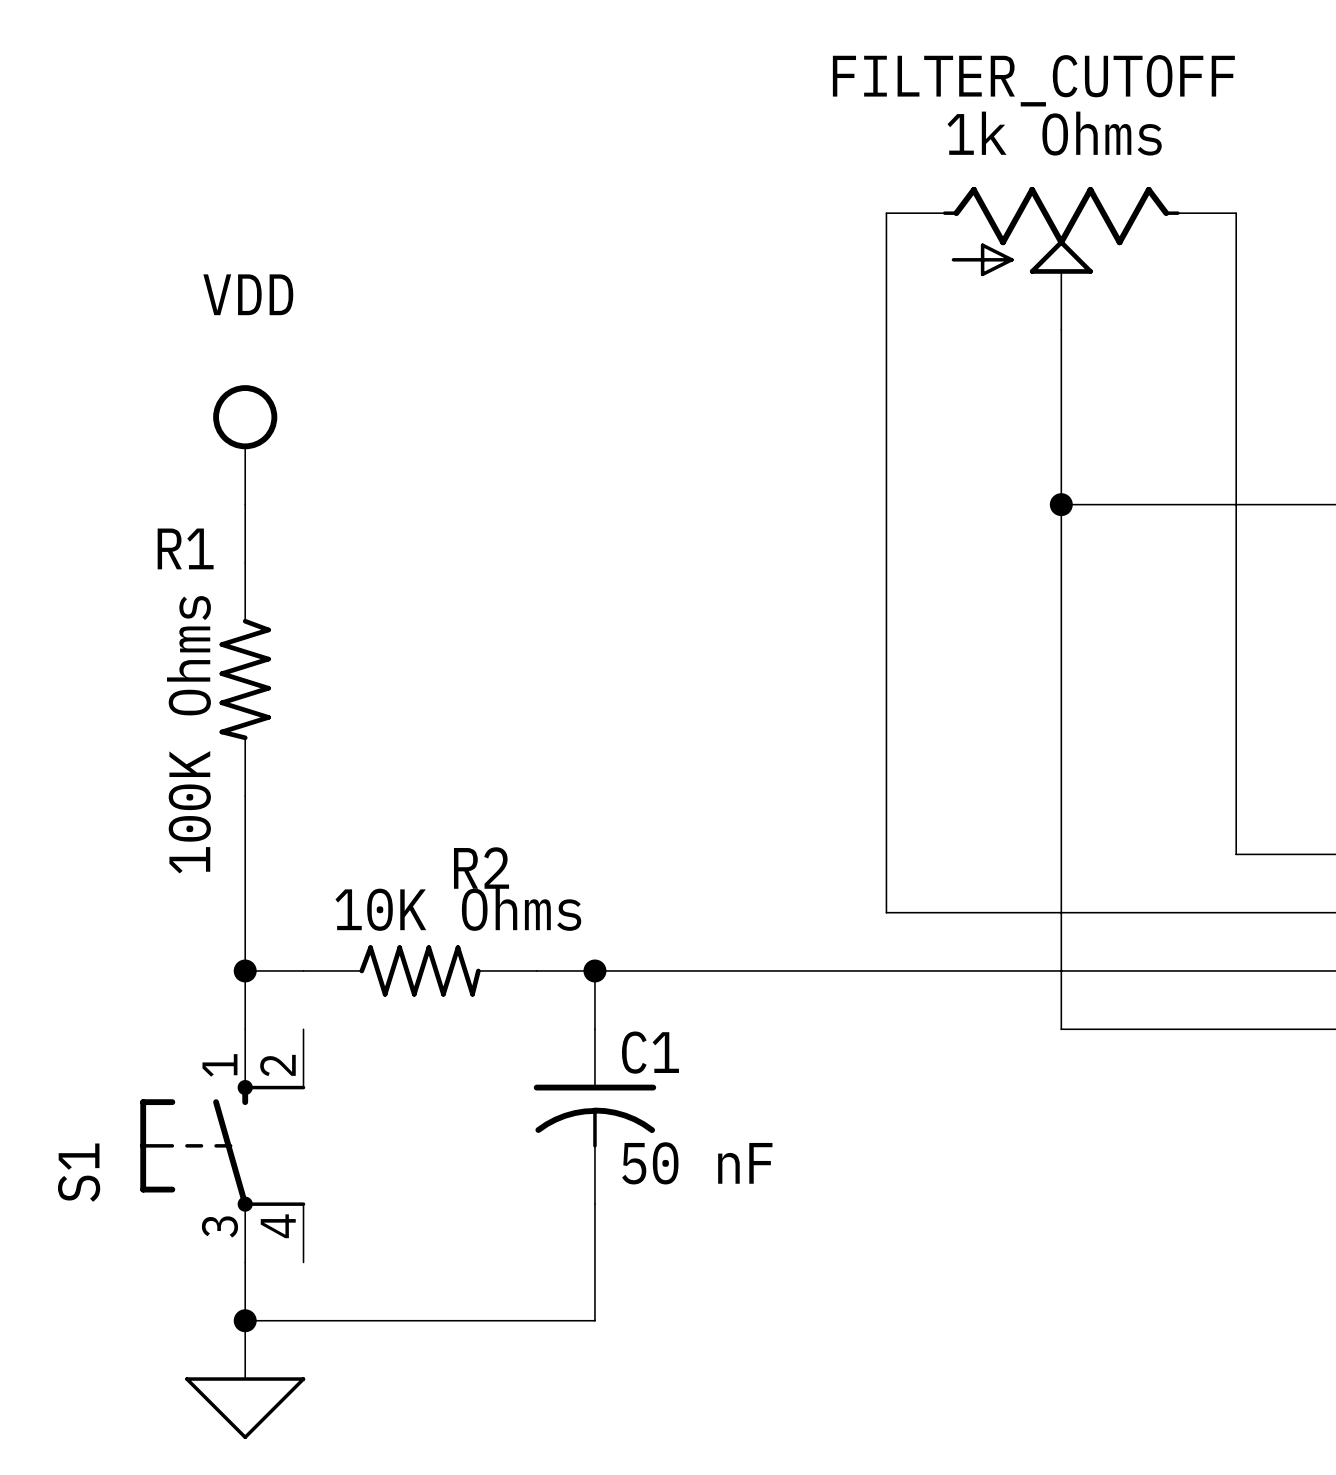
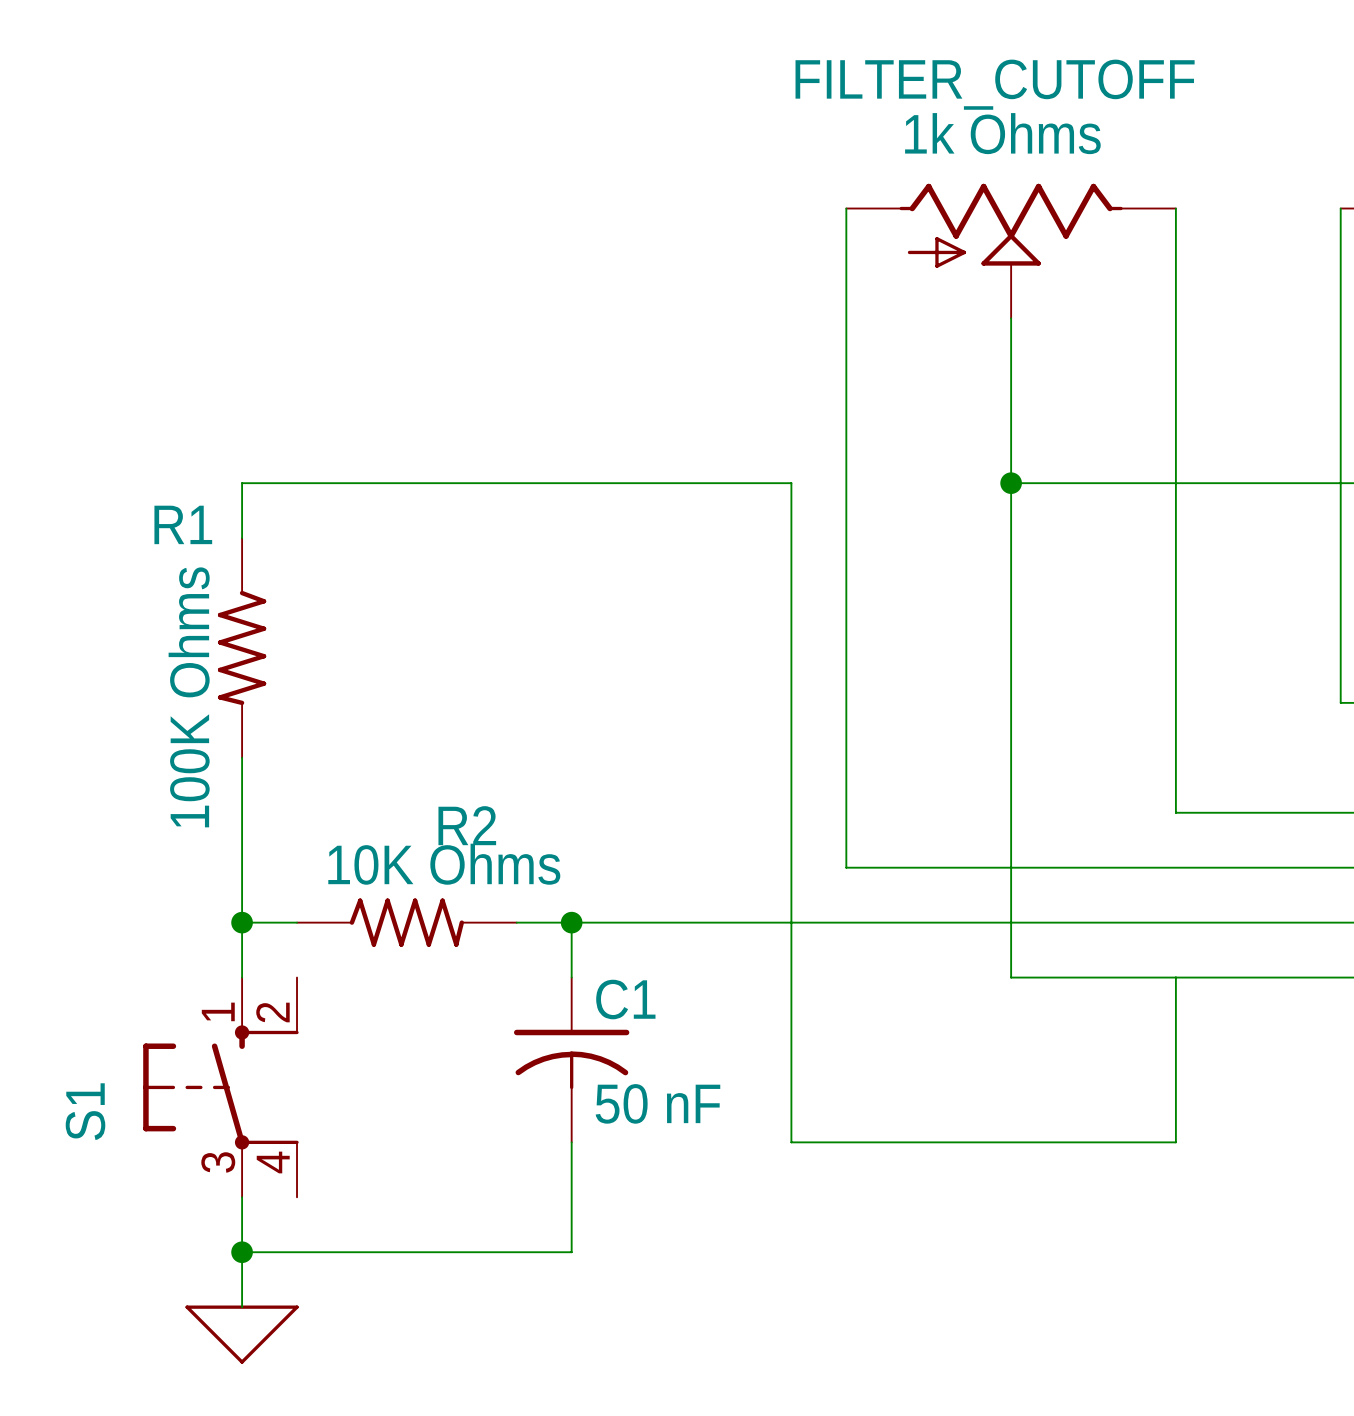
power symbol: VDD (245, 444) -> none
wire: none -> (242, 483) (791, 483) (791, 1142) (1175, 1142) (1175, 977)

